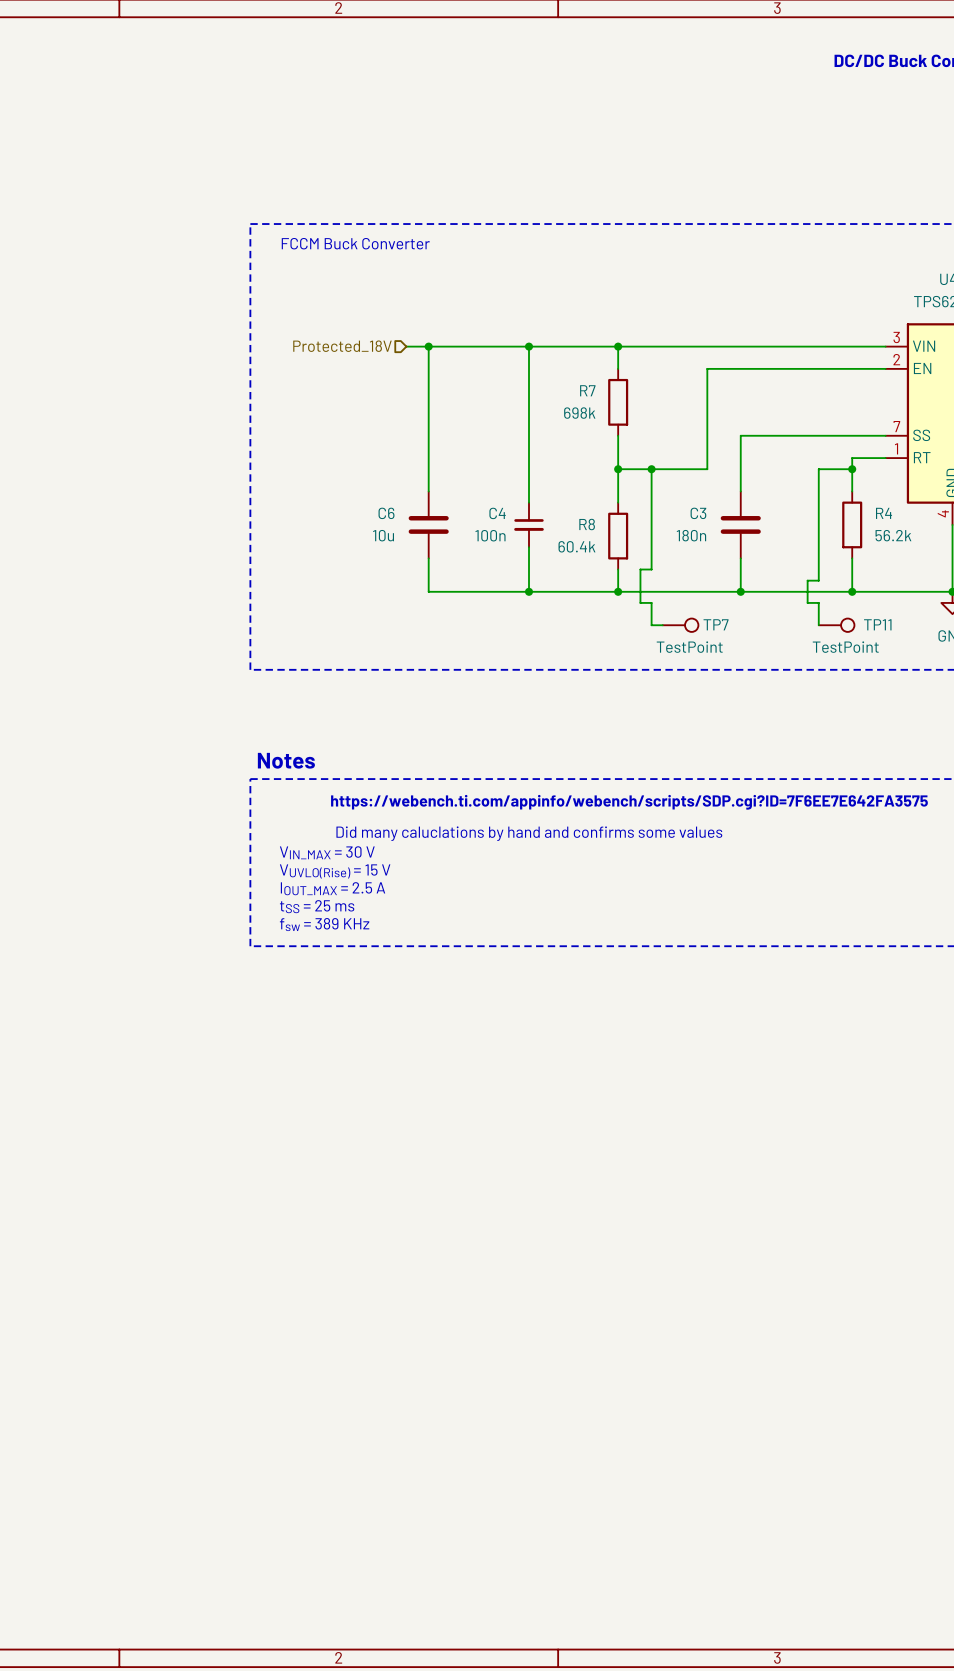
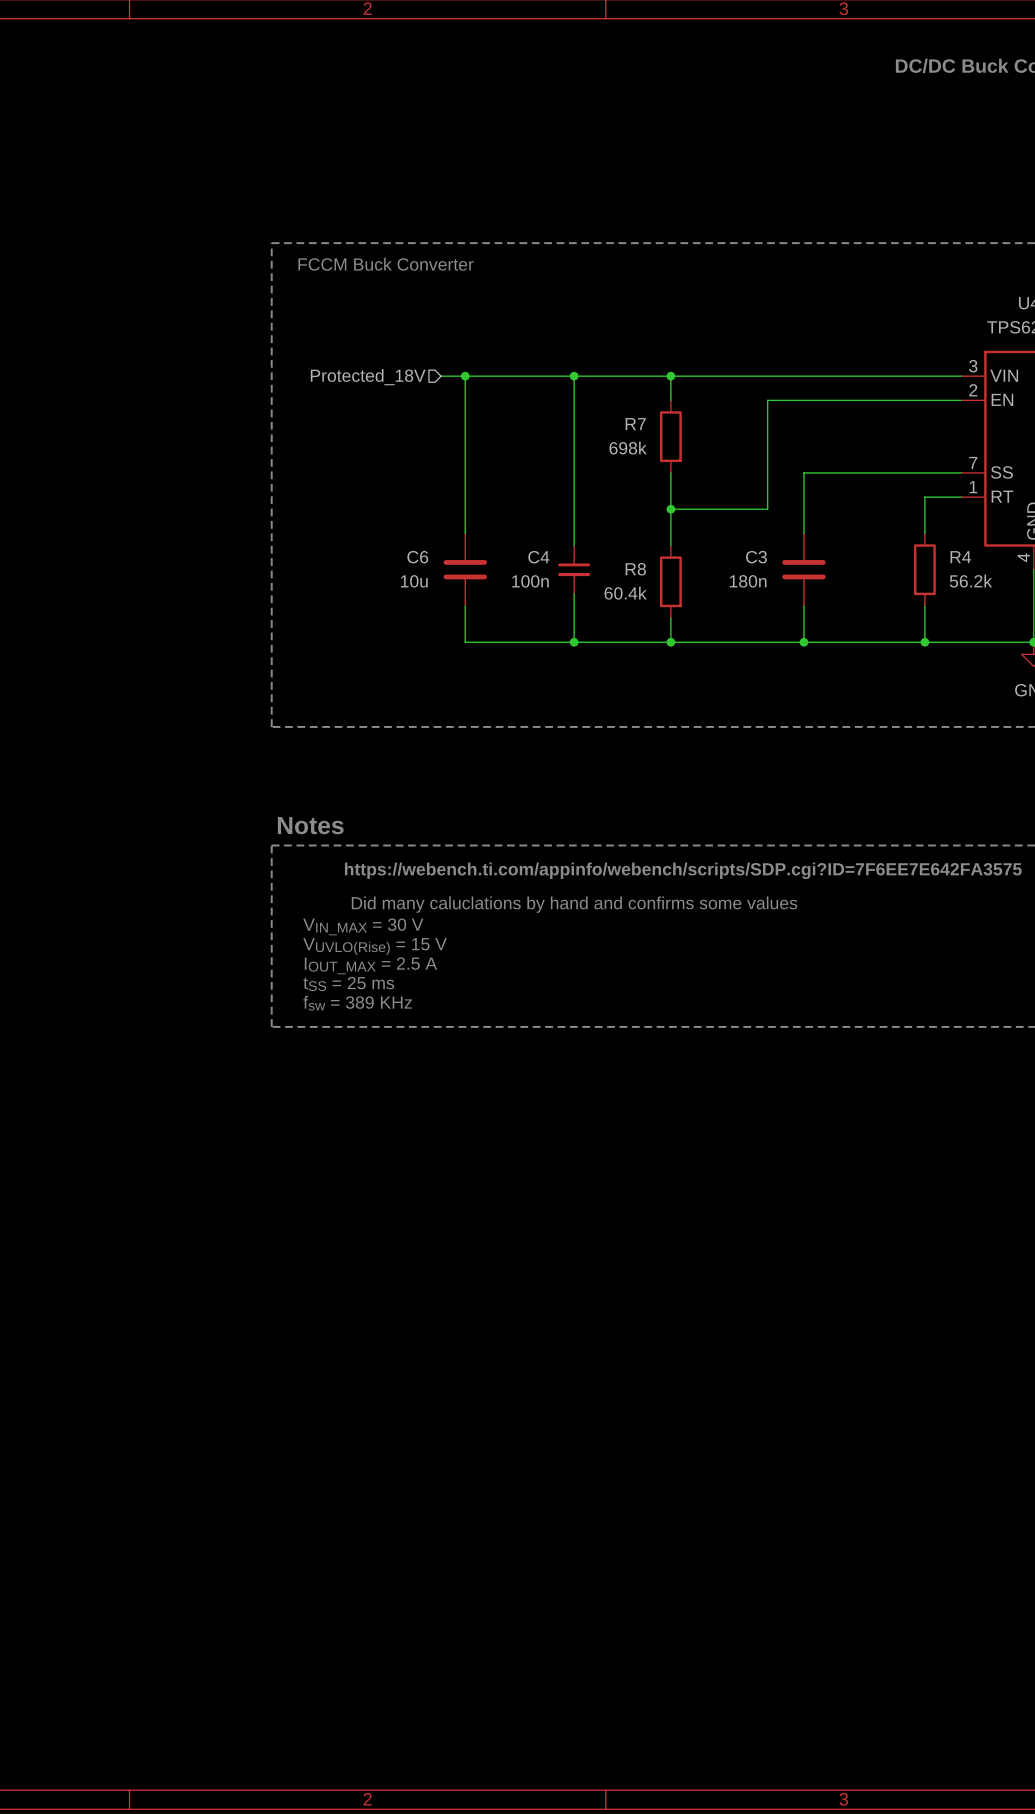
wire: (651, 469) (651, 569) (640, 569) (640, 602) (651, 602) (651, 625) (662, 625) -> none
junction: (651, 469) -> none
wire: (852, 469) (818, 469) (818, 580) (807, 580) (807, 602) (818, 602) (818, 625) -> none
junction: (852, 469) -> none
TP7: TestPoint (680, 625) -> none
TP11: TestPoint (836, 625) -> none

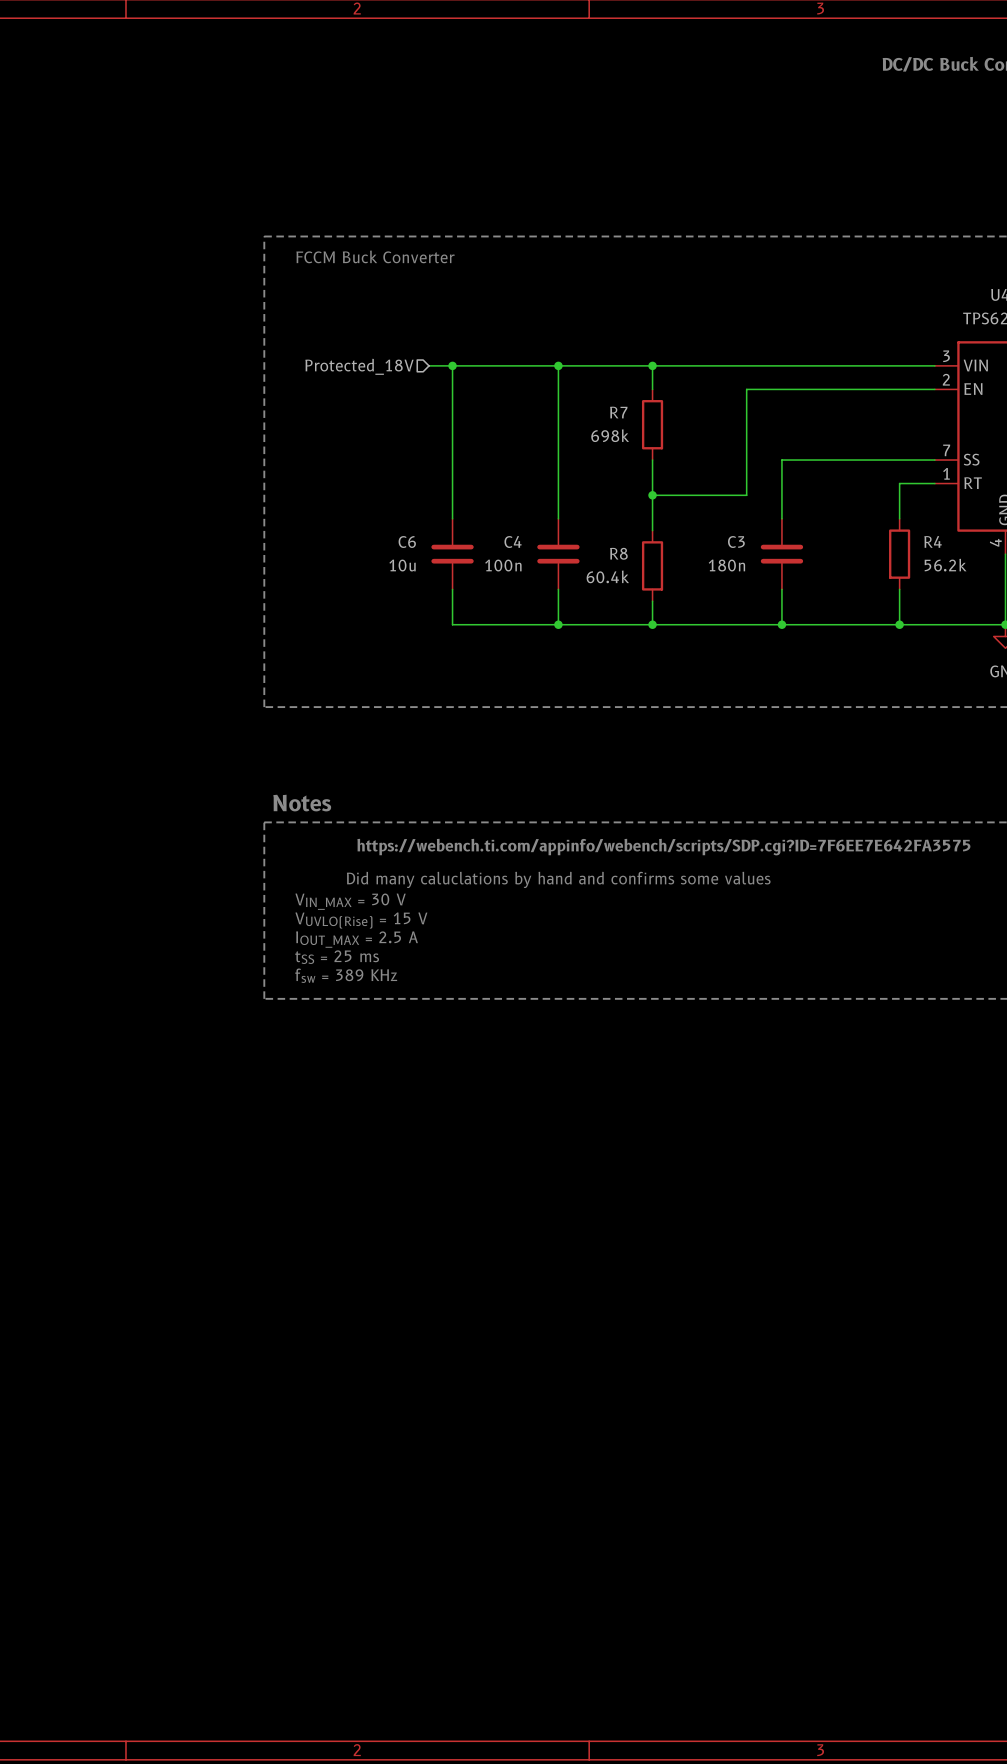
C4 symbol: [558, 545, 591, 594] -> [537, 518, 580, 590]

